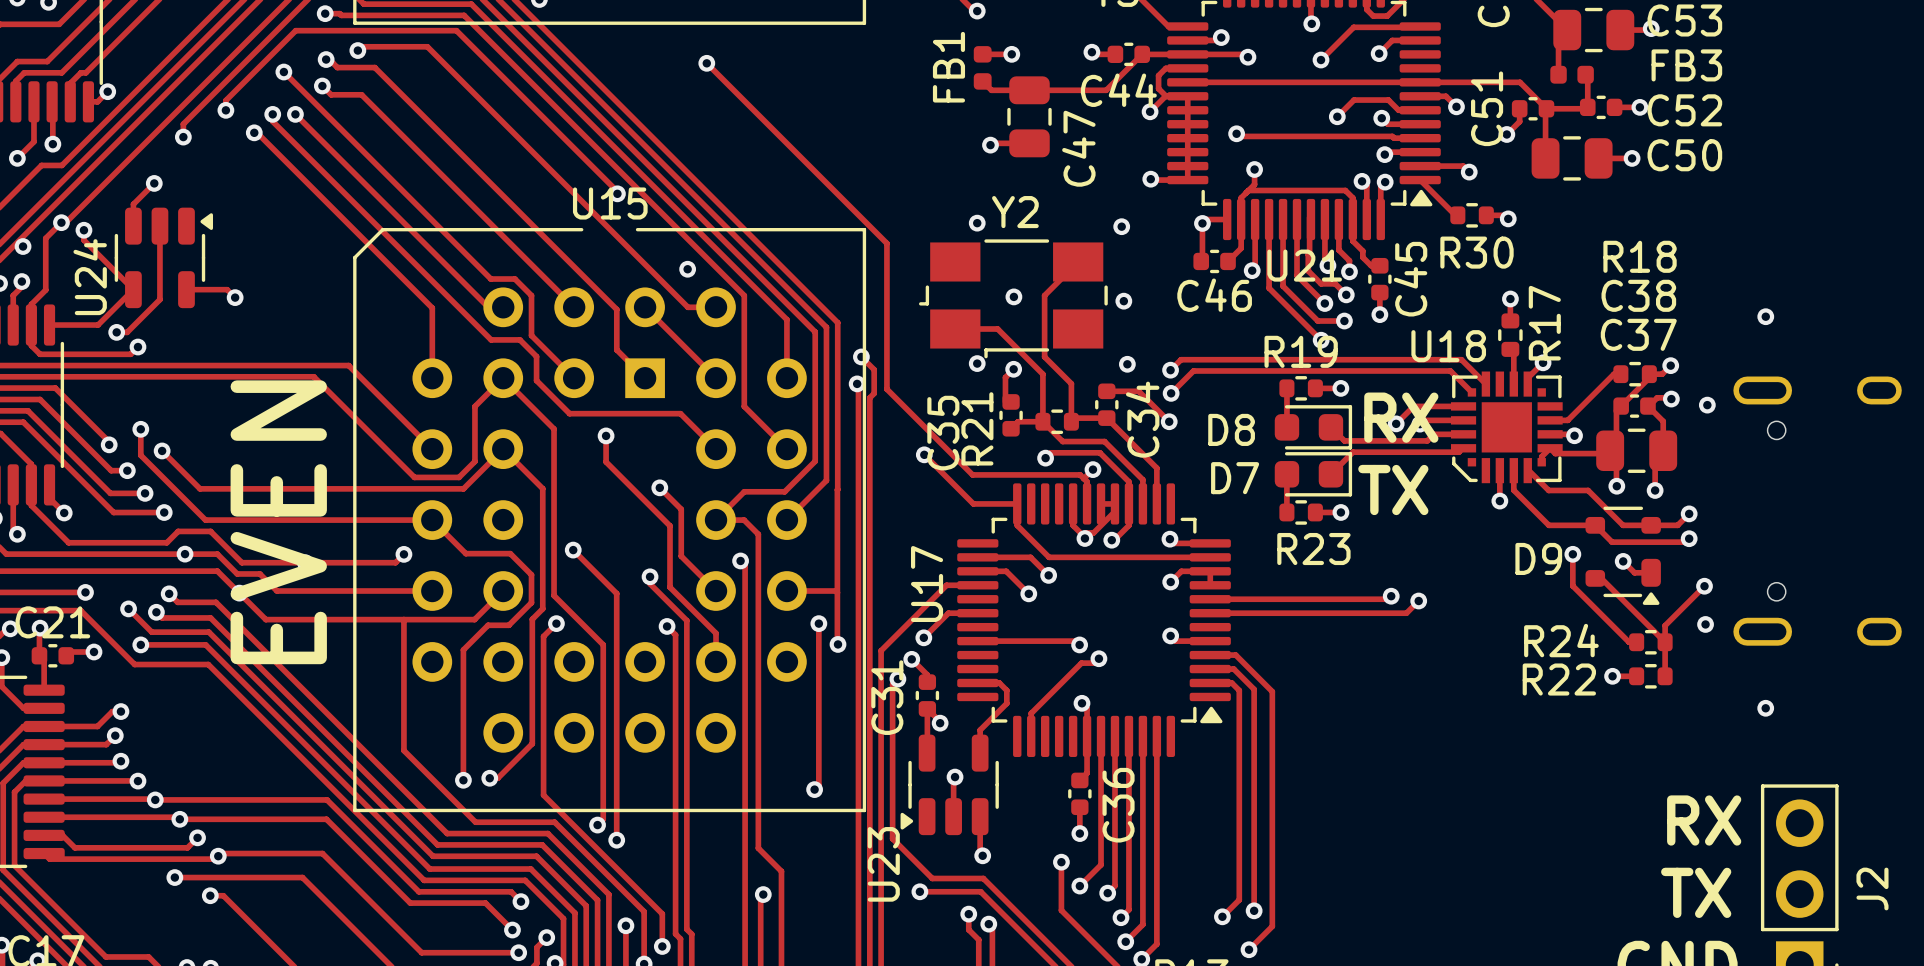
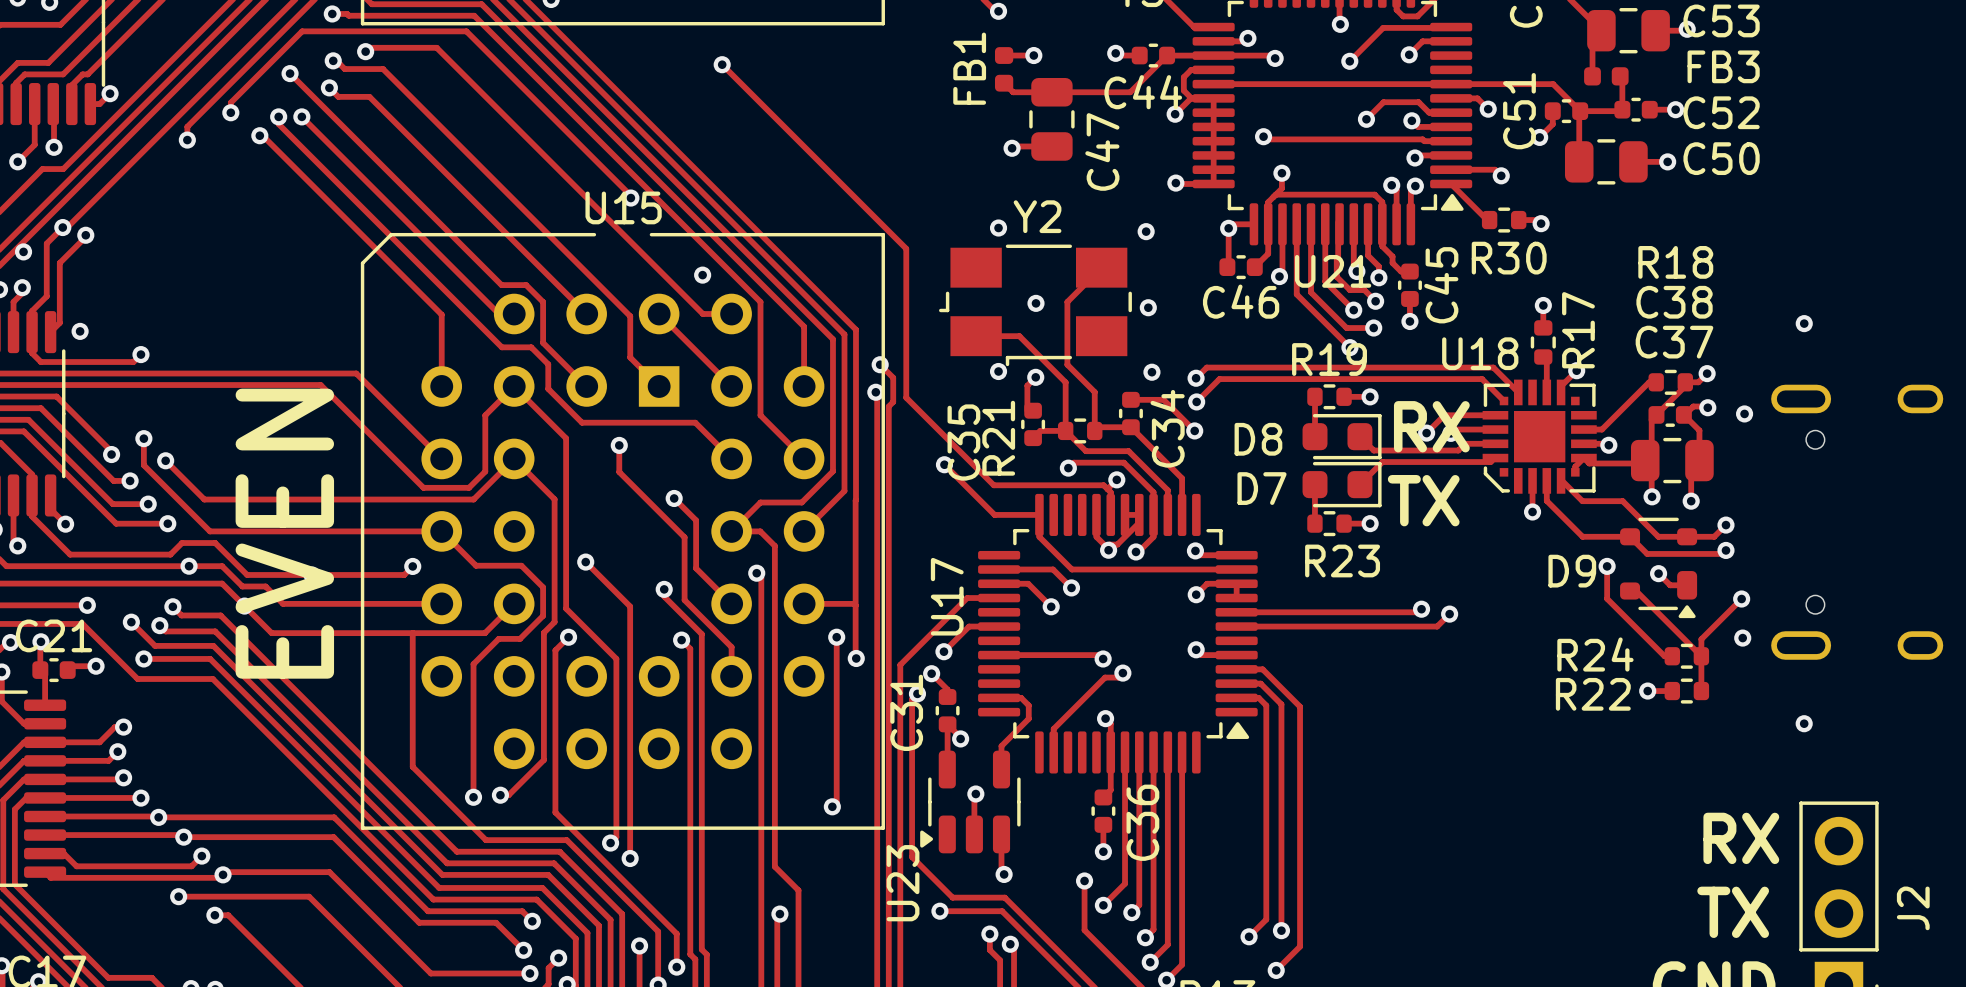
track: (154, 183) (133, 204) (133, 226) -> none
via: (154, 183) -> none
track: (159, 226) (159, 299) (127, 332) (116, 332) -> none
track: (83, 230) (83, 240) (133, 289) (98, 325) (49, 325) -> (85, 237) (59, 262) (59, 322) (50, 332)
U24: (163, 257) -> none
track: (186, 289) (227, 289) (235, 297) -> none
via: (235, 297) -> none
via position: (116, 332) -> (80, 331)

